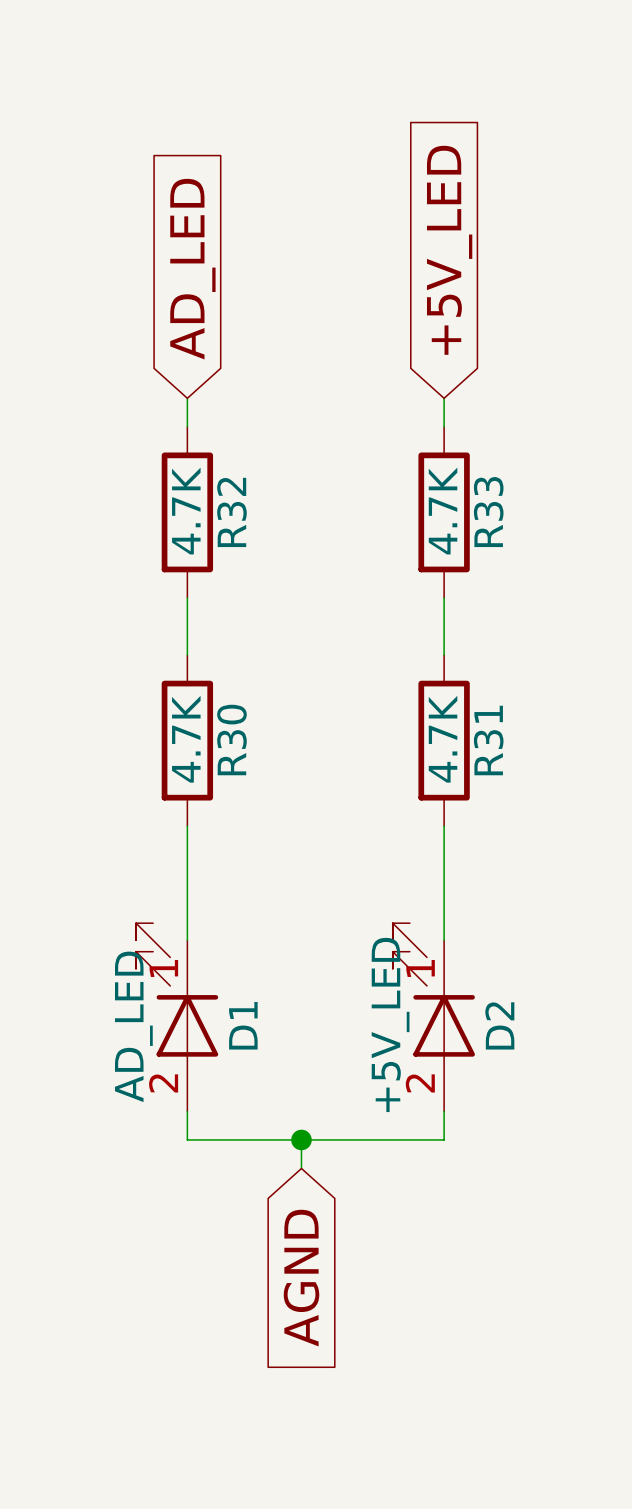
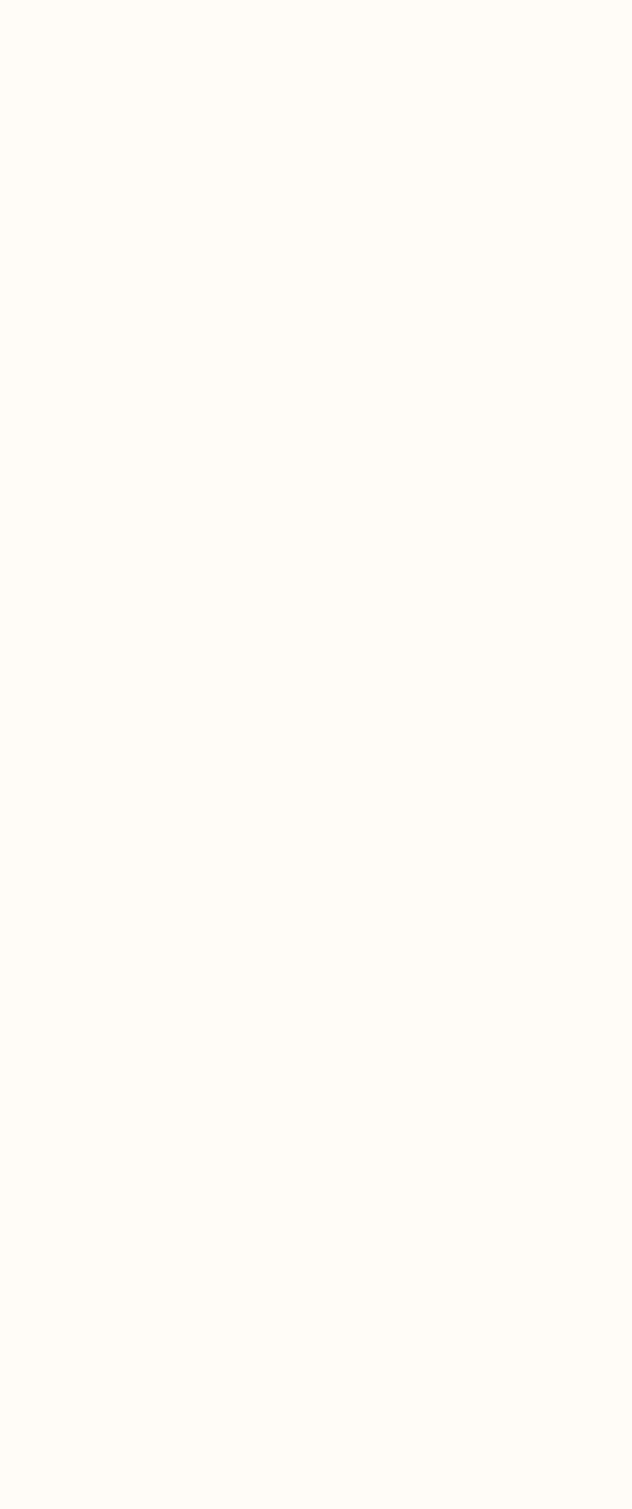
global label: +5V_LED (449, 250) -> none
global label: AD_LED (192, 269) -> none
wire: (187, 398) (187, 426) -> none
wire: (444, 398) (444, 426) -> none
R32: 4.7K (187, 512) -> none
R33: 4.7K (444, 512) -> none
wire: (187, 597) (187, 655) -> none
wire: (444, 597) (444, 655) -> none
R30: 4.7K (187, 740) -> none
R31: 4.7K (444, 740) -> none
wire: (187, 826) (187, 940) -> none
wire: (444, 826) (444, 940) -> none
D1: AD_LED (177, 1017) -> none
D2: +5V_LED (433, 1017) -> none
wire: (187, 1111) (187, 1139) (444, 1139) (444, 1111) -> none
wire: (301, 1139) (301, 1168) -> none
junction: (301, 1139) -> none
global label: AGND (301, 1278) -> none

